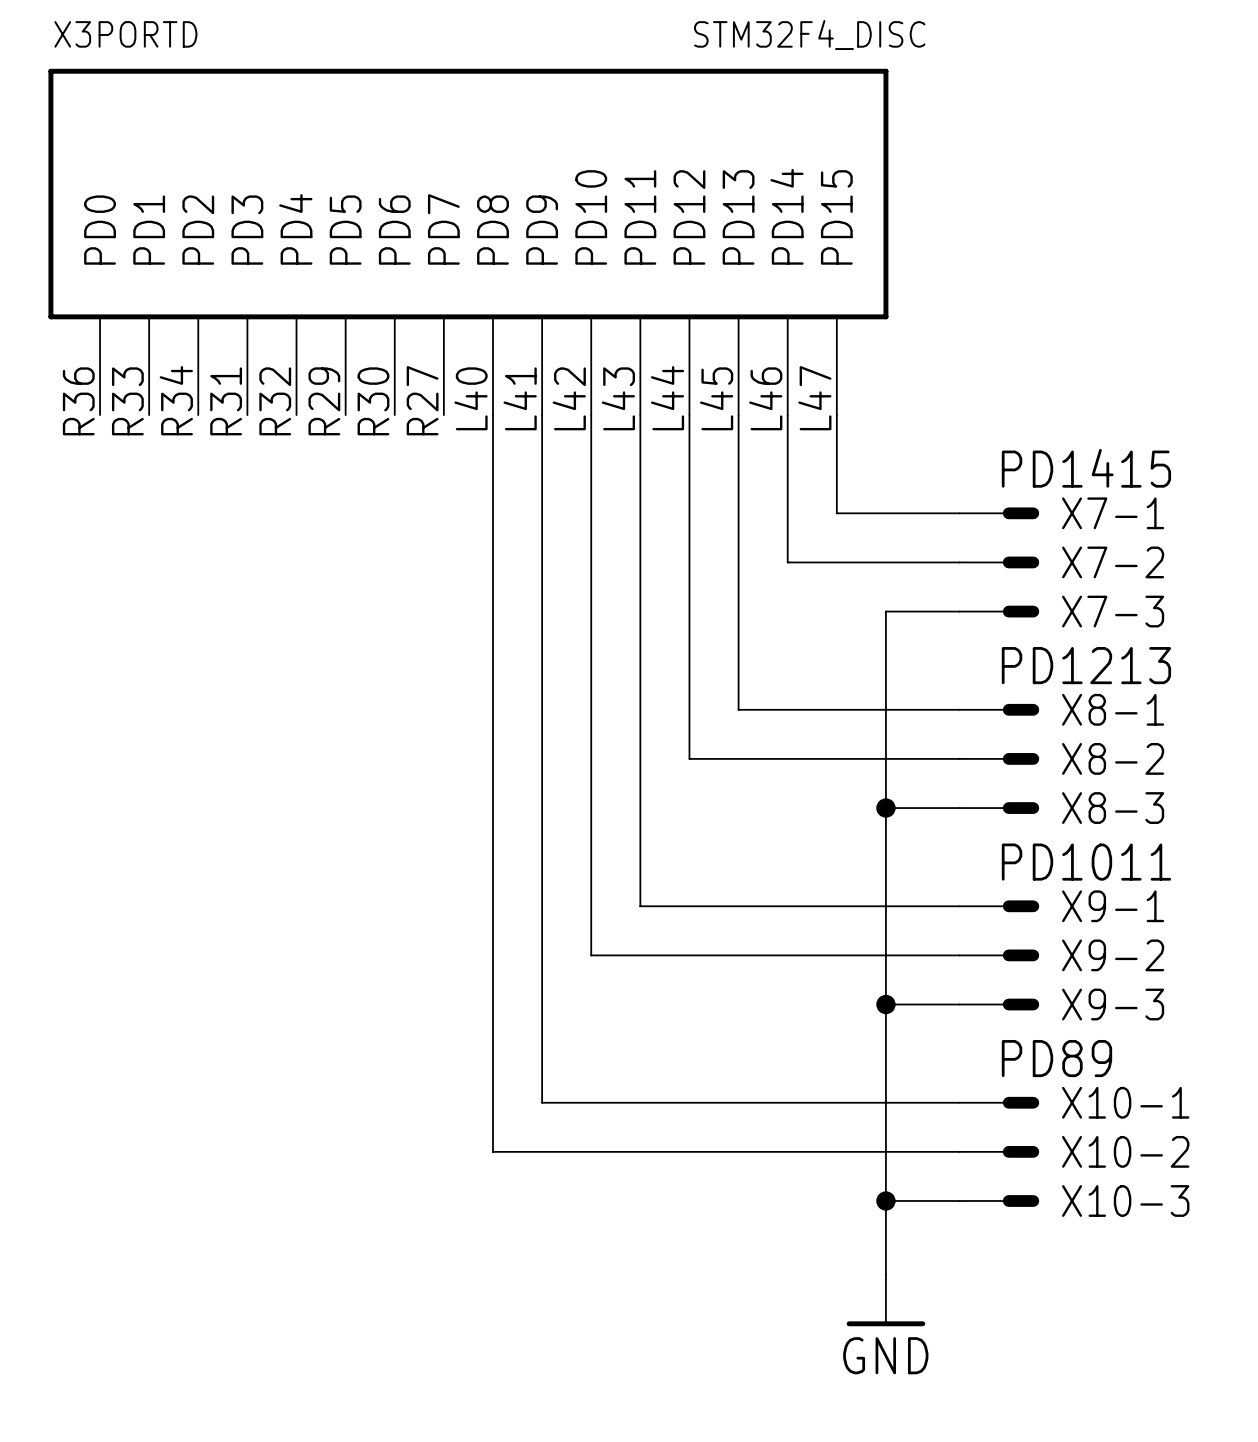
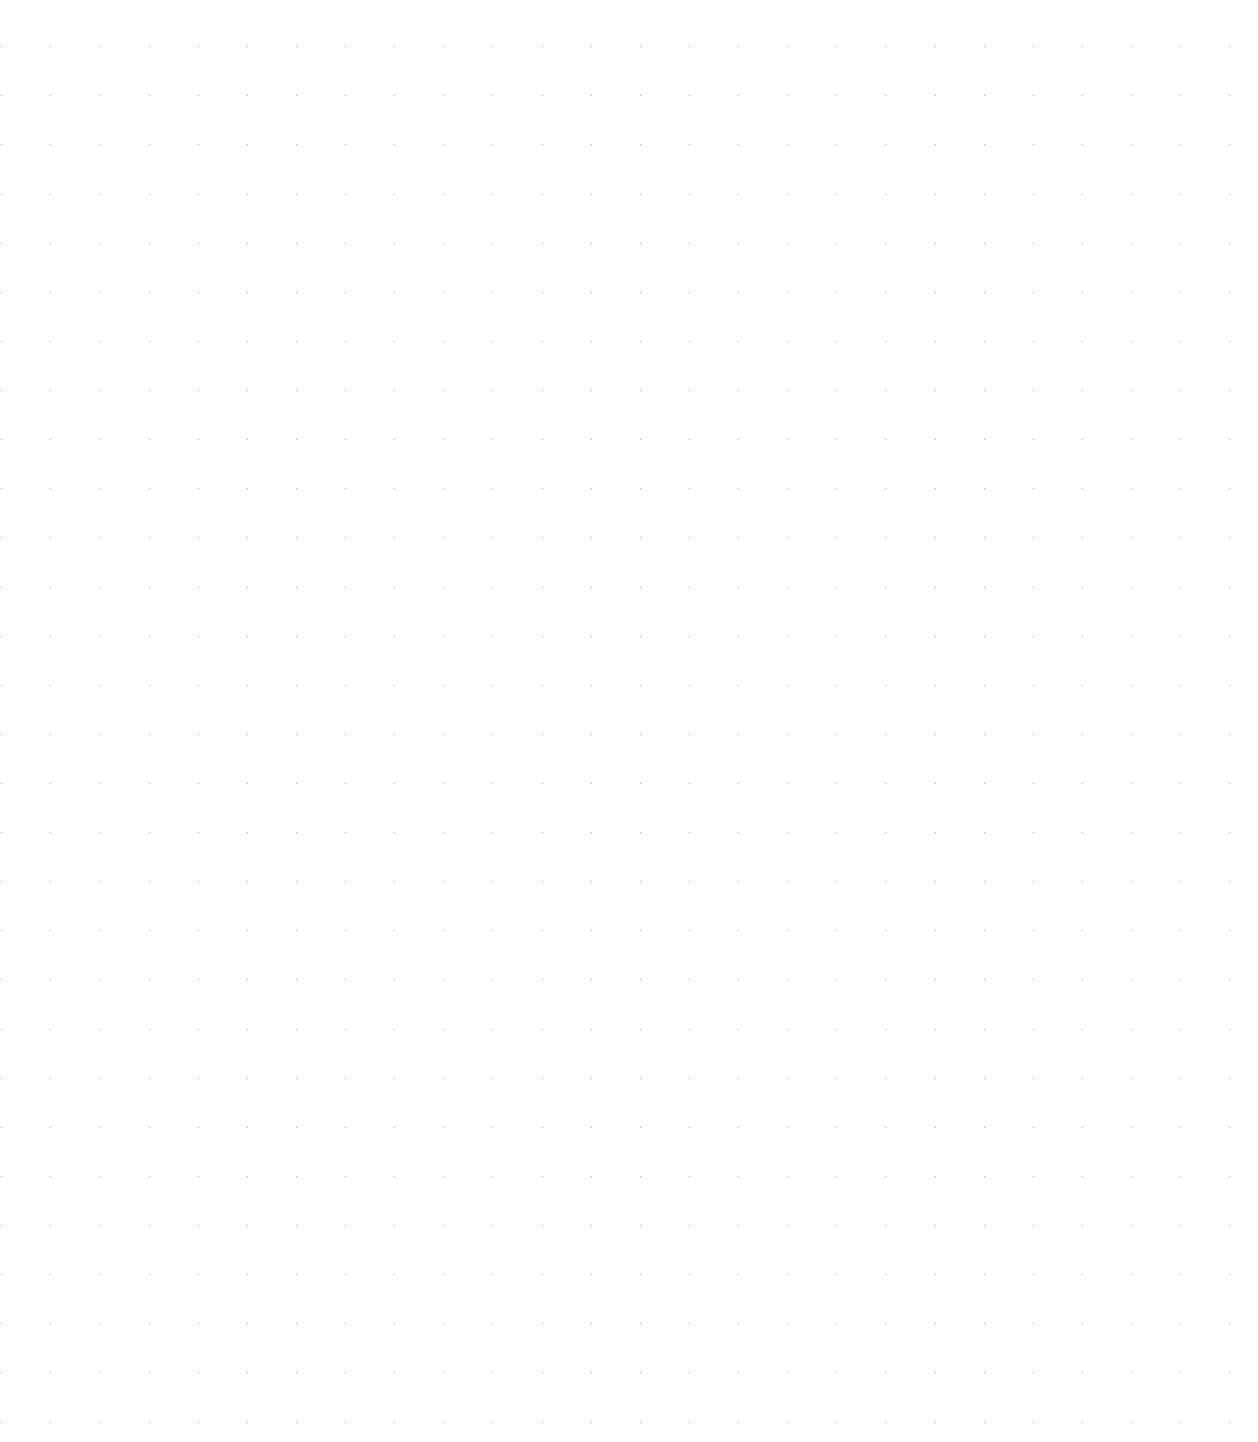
X3PORTD: STM32F4_DISC (468, 241) -> none
wire: (492, 415) (492, 1151) (959, 1151) -> none
wire: (542, 415) (542, 1102) (959, 1102) -> none
wire: (591, 415) (591, 955) (959, 955) -> none
wire: (640, 415) (640, 906) (959, 906) -> none
wire: (689, 415) (689, 758) (959, 758) -> none
wire: (738, 415) (738, 709) (959, 709) -> none
wire: (787, 415) (787, 562) (959, 562) -> none
wire: (836, 415) (836, 513) (959, 513) -> none
X7-1: PD1415 (999, 513) -> none
X7-2: (999, 562) -> none
wire: (959, 611) (885, 611) (885, 1274) -> none
X7-3: (999, 611) -> none
X8-1: PD1213 (999, 709) -> none
X8-2: (999, 758) -> none
wire: (885, 808) (959, 808) -> none
junction: (885, 808) -> none
X8-3: (999, 808) -> none
X9-1: PD1011 (999, 906) -> none
X9-2: (999, 955) -> none
wire: (885, 1004) (959, 1004) -> none
junction: (885, 1004) -> none
X9-3: (999, 1004) -> none
X10-1: PD89 (999, 1102) -> none
X10-2: (999, 1151) -> none
wire: (885, 1200) (959, 1200) -> none
junction: (885, 1200) -> none
X10-3: (999, 1200) -> none
power symbol: GND (885, 1300) -> none

